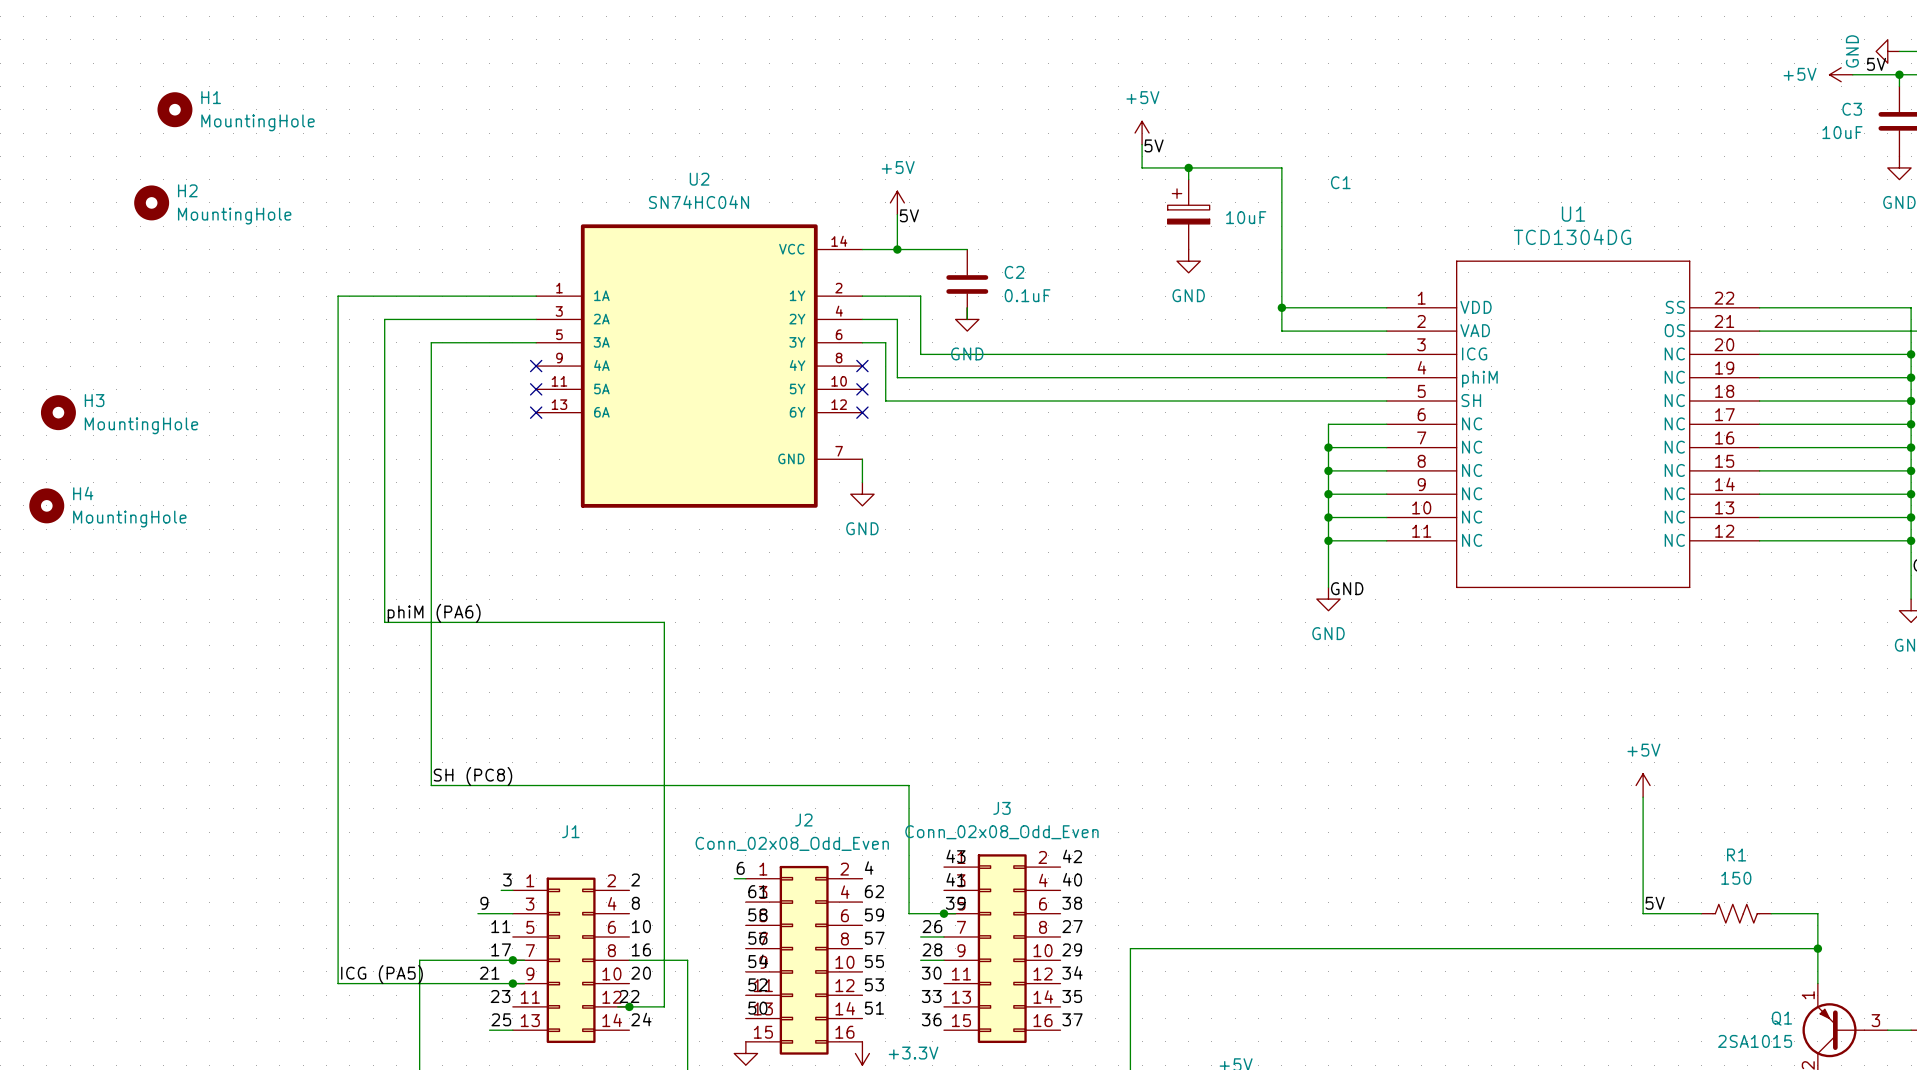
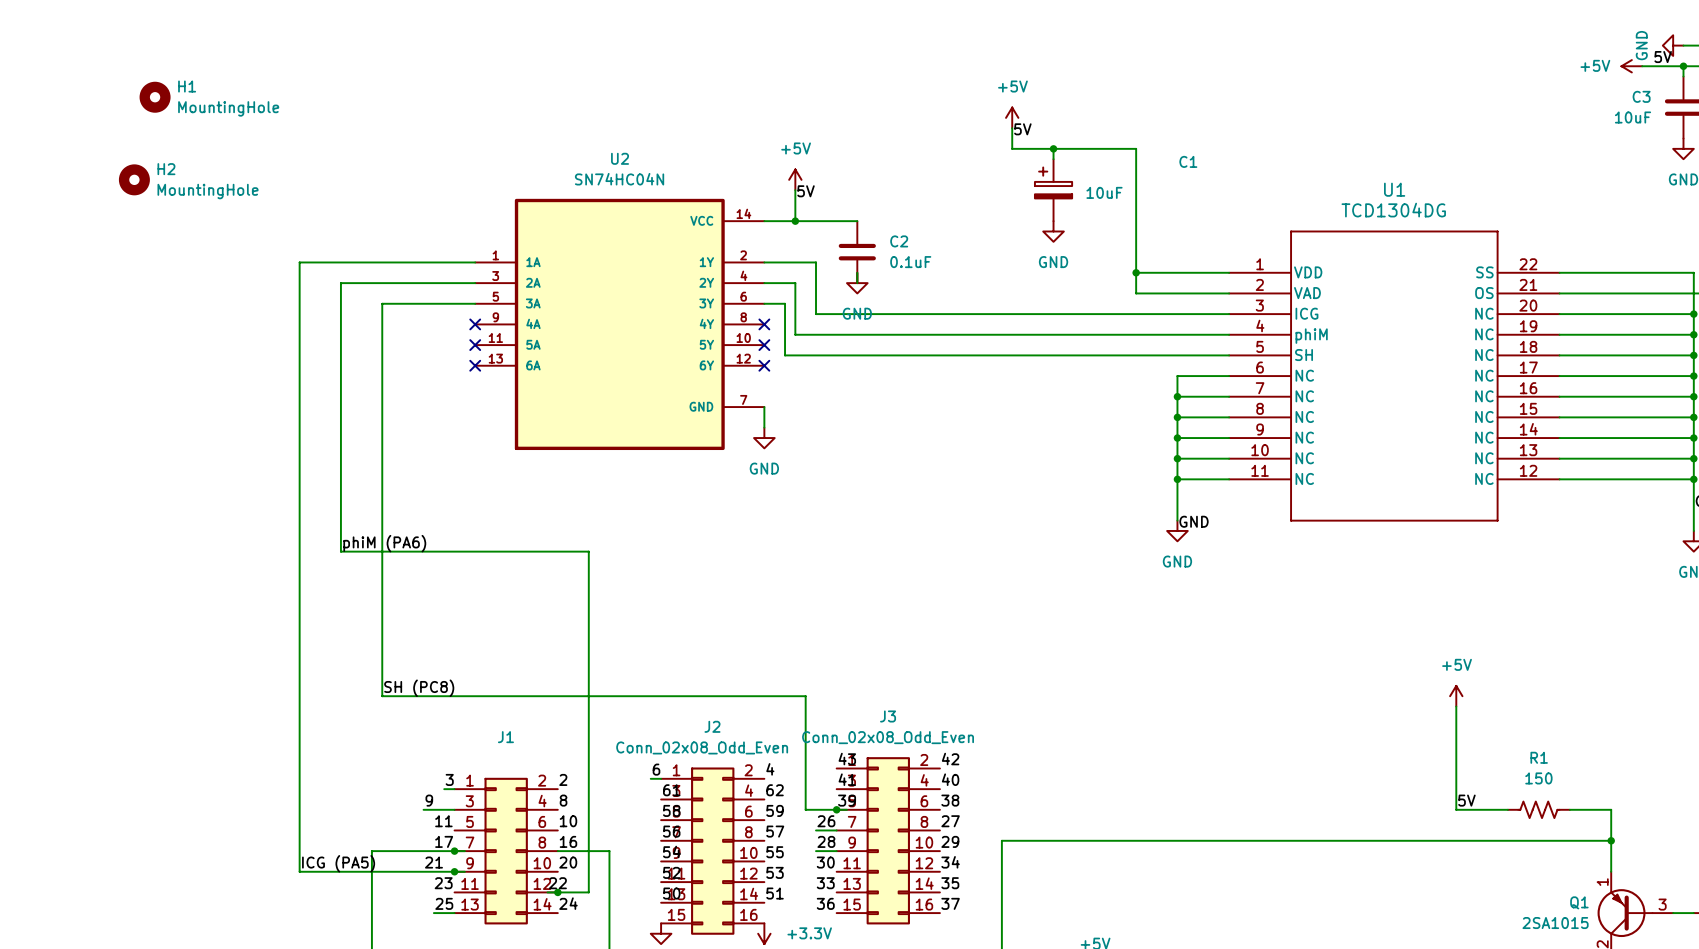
H3: MountingHole (58, 412) -> none
H4: MountingHole (46, 505) -> none

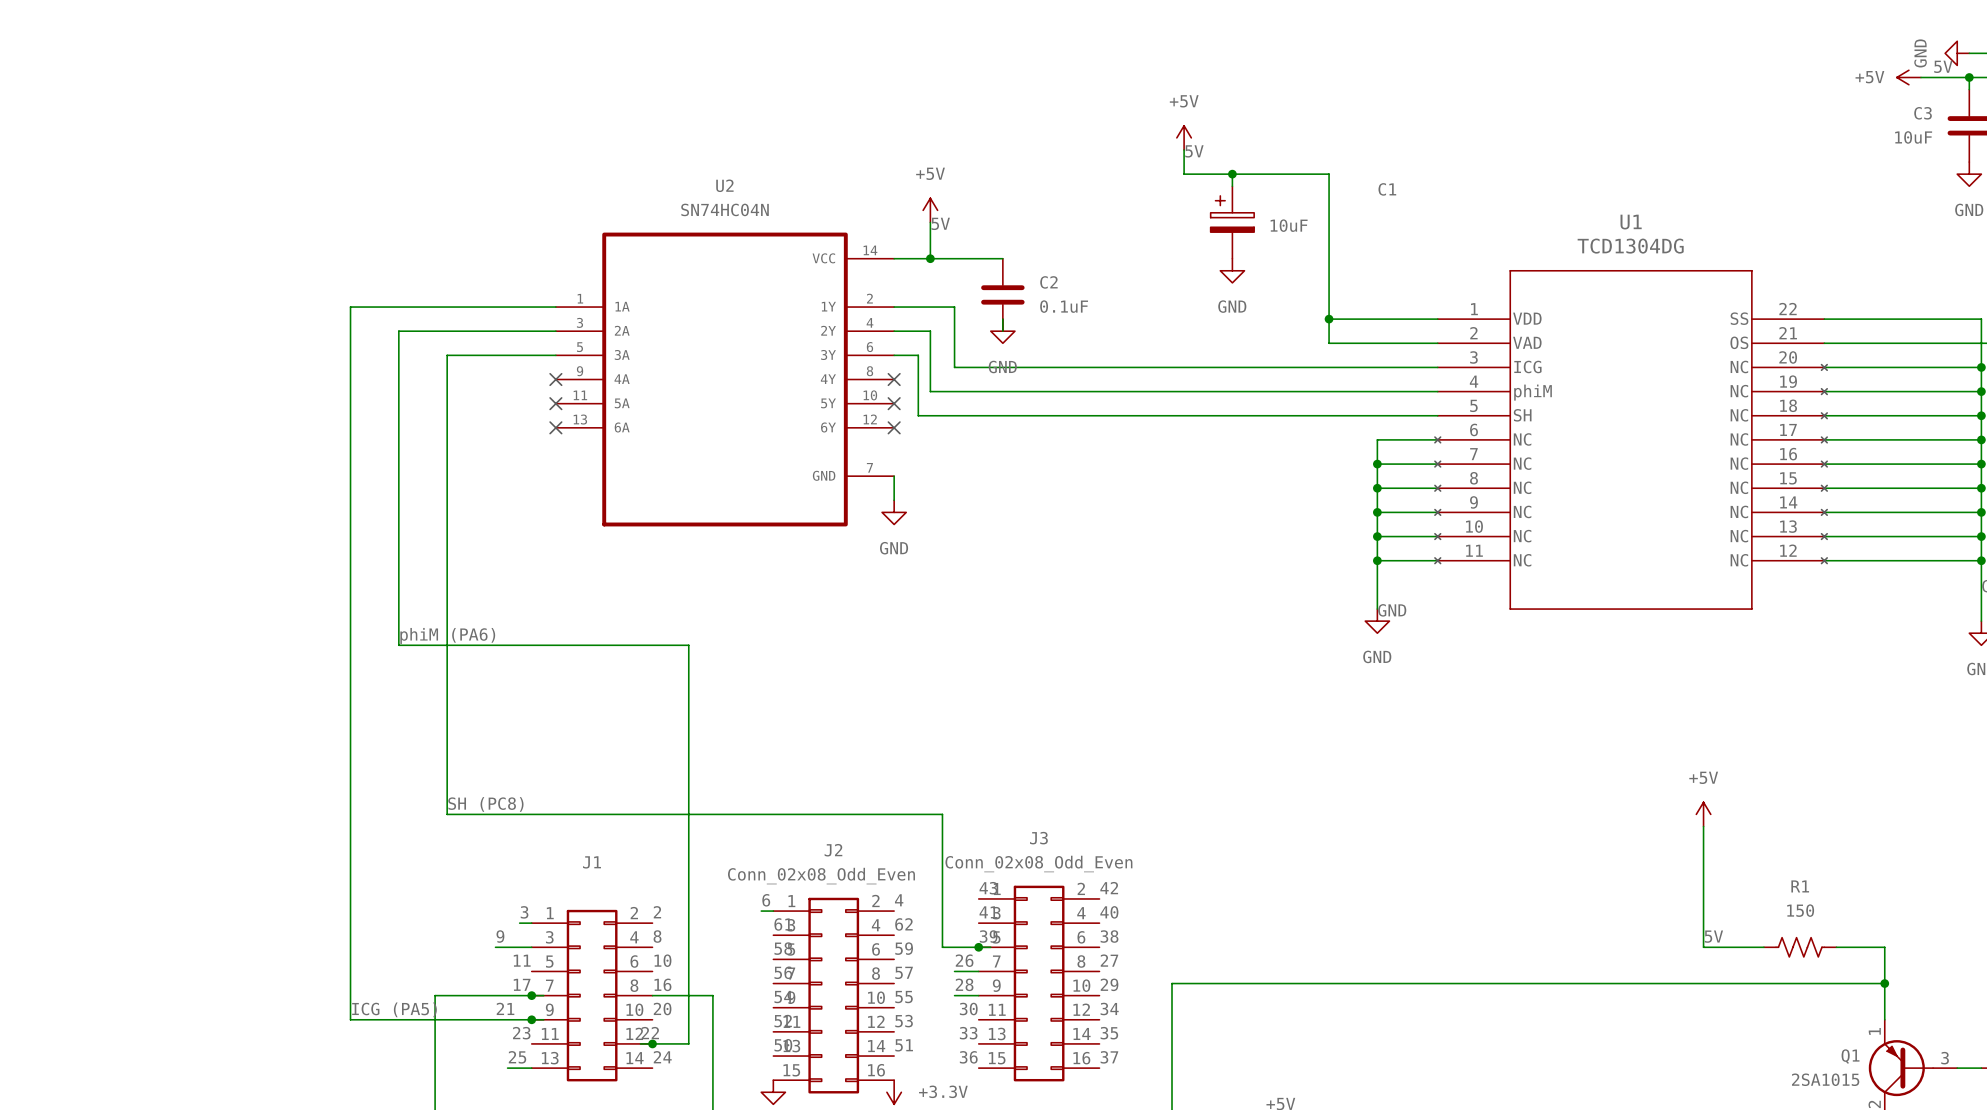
H1: MountingHole (155, 97) -> none
H2: MountingHole (134, 179) -> none
U1 symbol: [1229, 230, 1560, 522] -> [1434, 270, 1828, 610]

